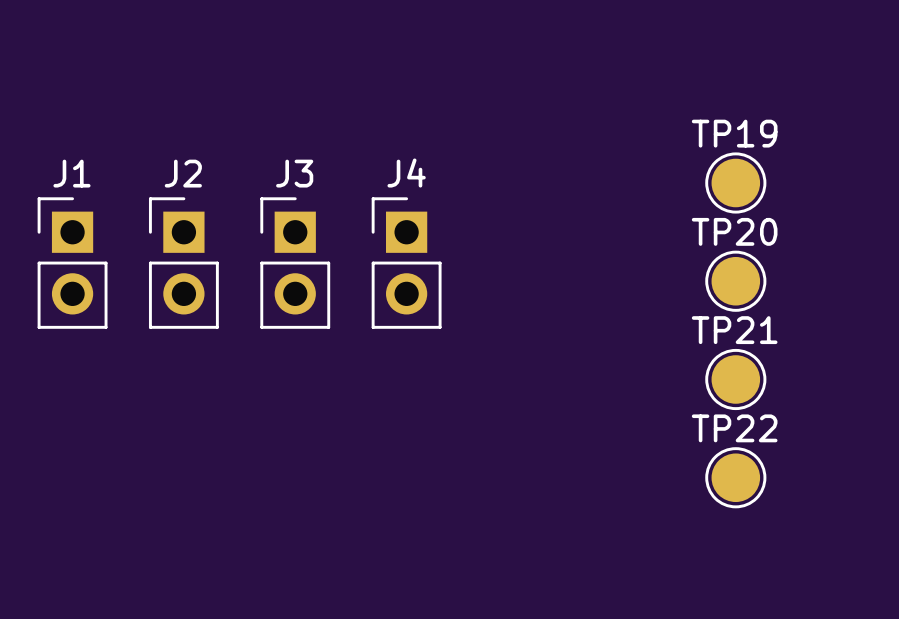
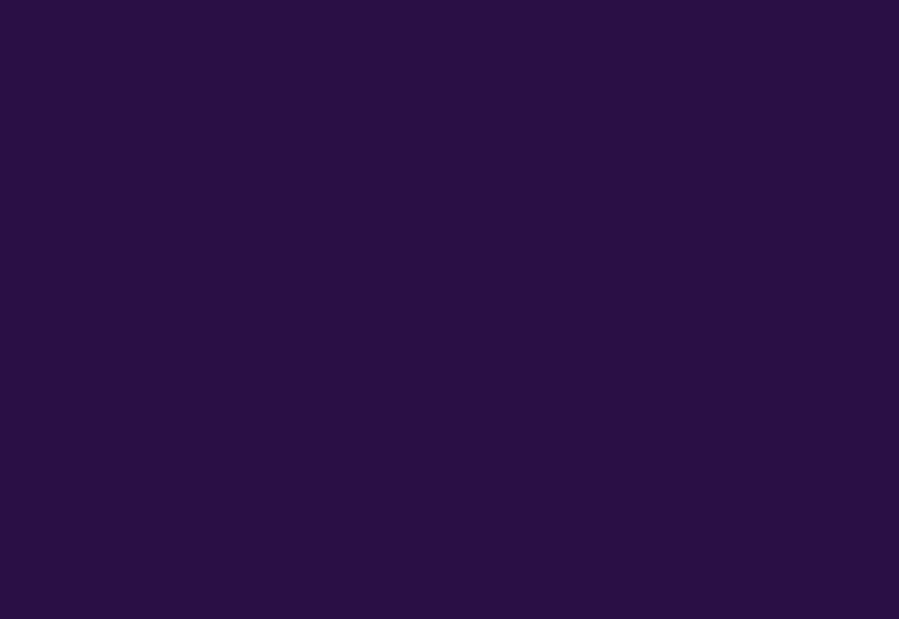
TP19: (735, 182) -> none
J1: (72, 263) -> none
J2: (183, 263) -> none
J3: (295, 263) -> none
J4: (406, 263) -> none
TP20: (735, 281) -> none
TP21: (735, 379) -> none
TP22: (735, 477) -> none

